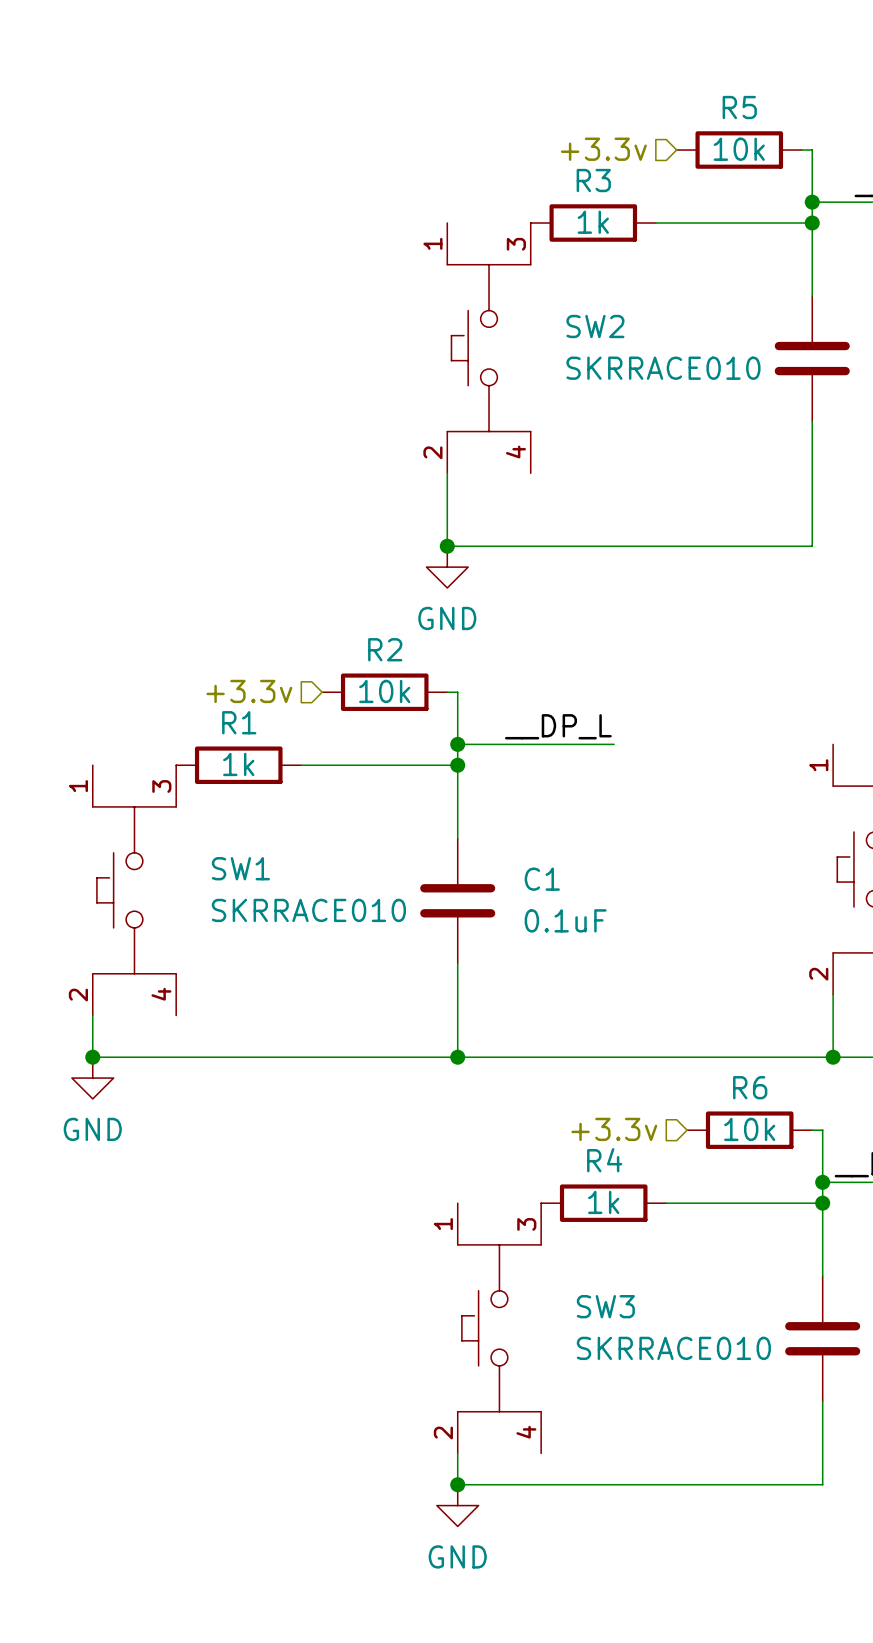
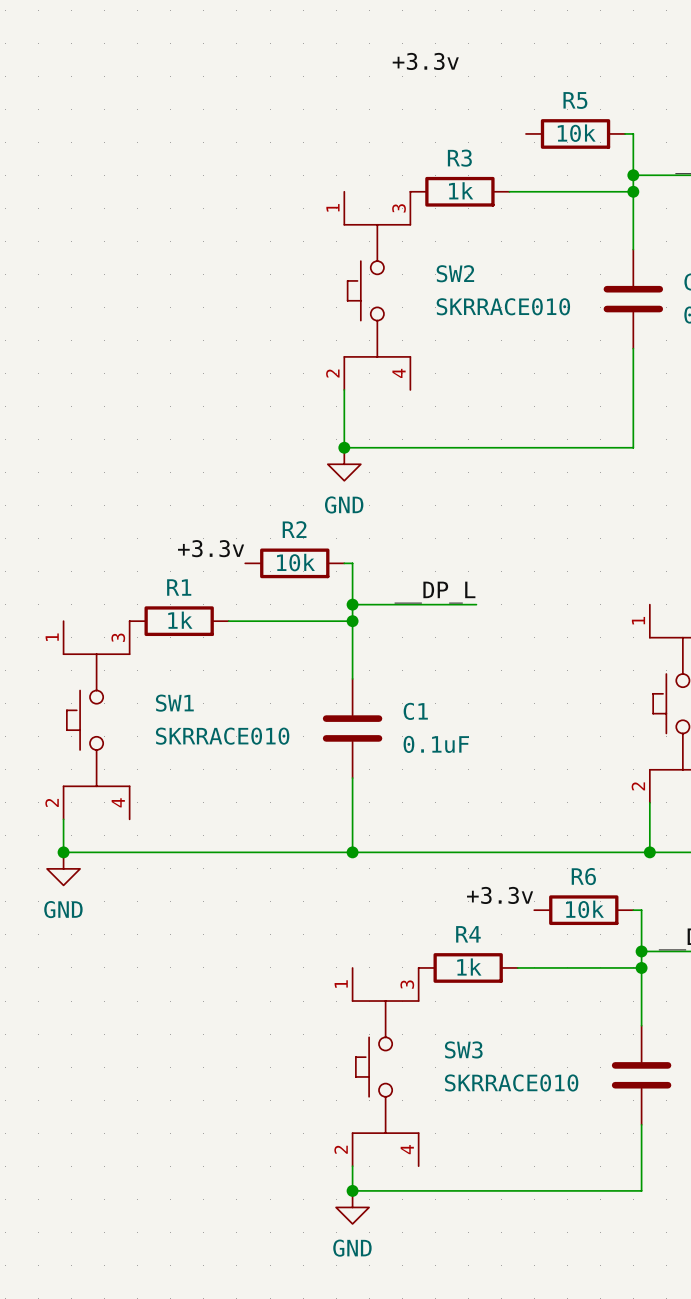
label: none -> +3.3v (425, 61)
hierarchical label: +3.3v (603, 149) -> none
label: none -> +3.3v (211, 548)
hierarchical label: +3.3v (249, 691) -> none
label: none -> +3.3v (500, 895)
hierarchical label: +3.3v (614, 1129) -> none

